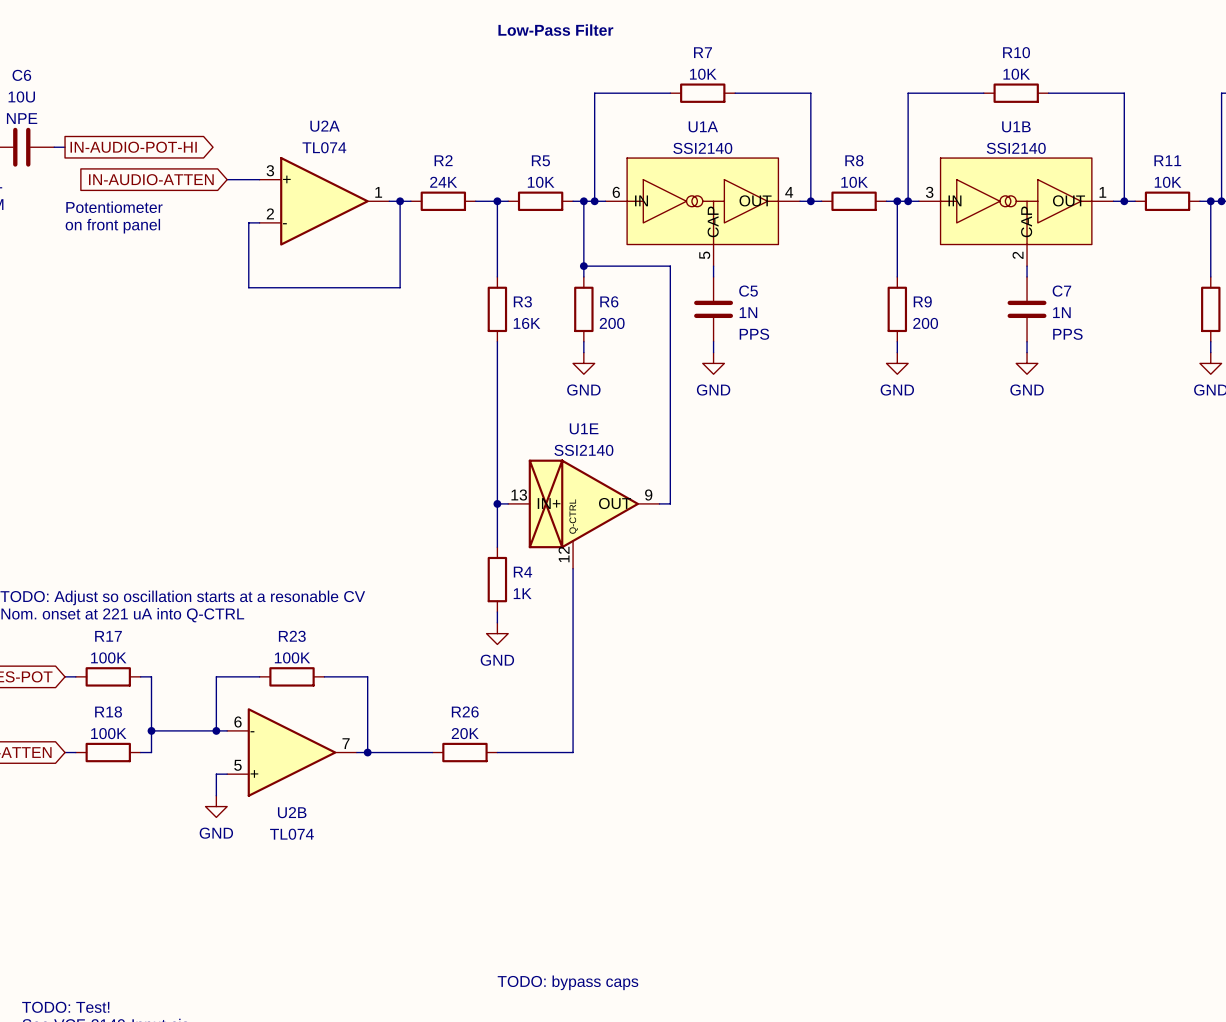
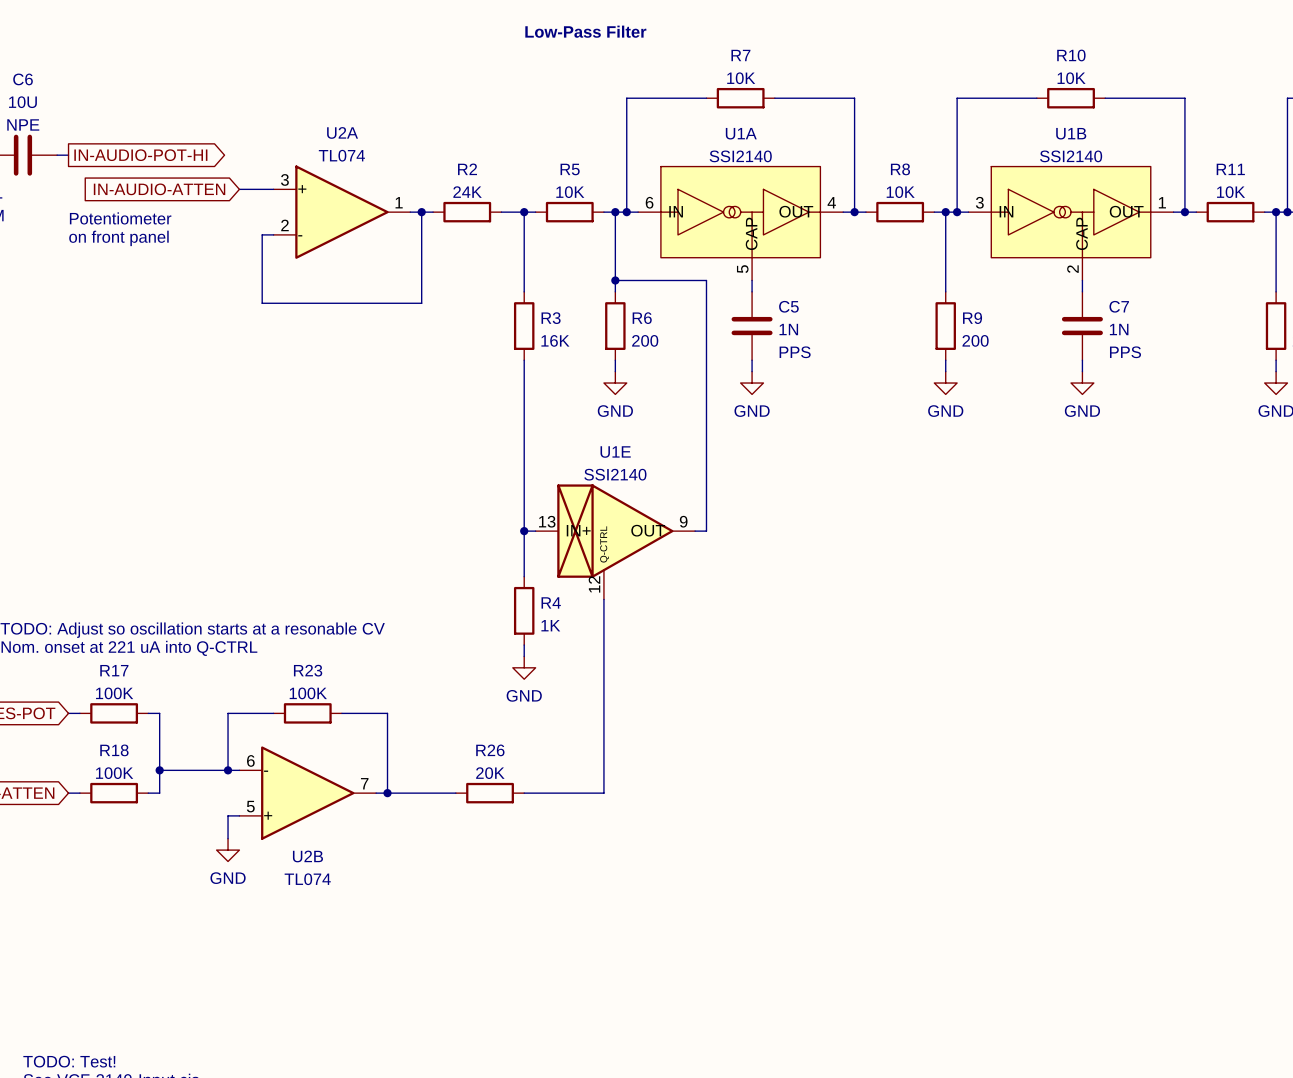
text: TODO: bypass caps (568, 982) -> none

